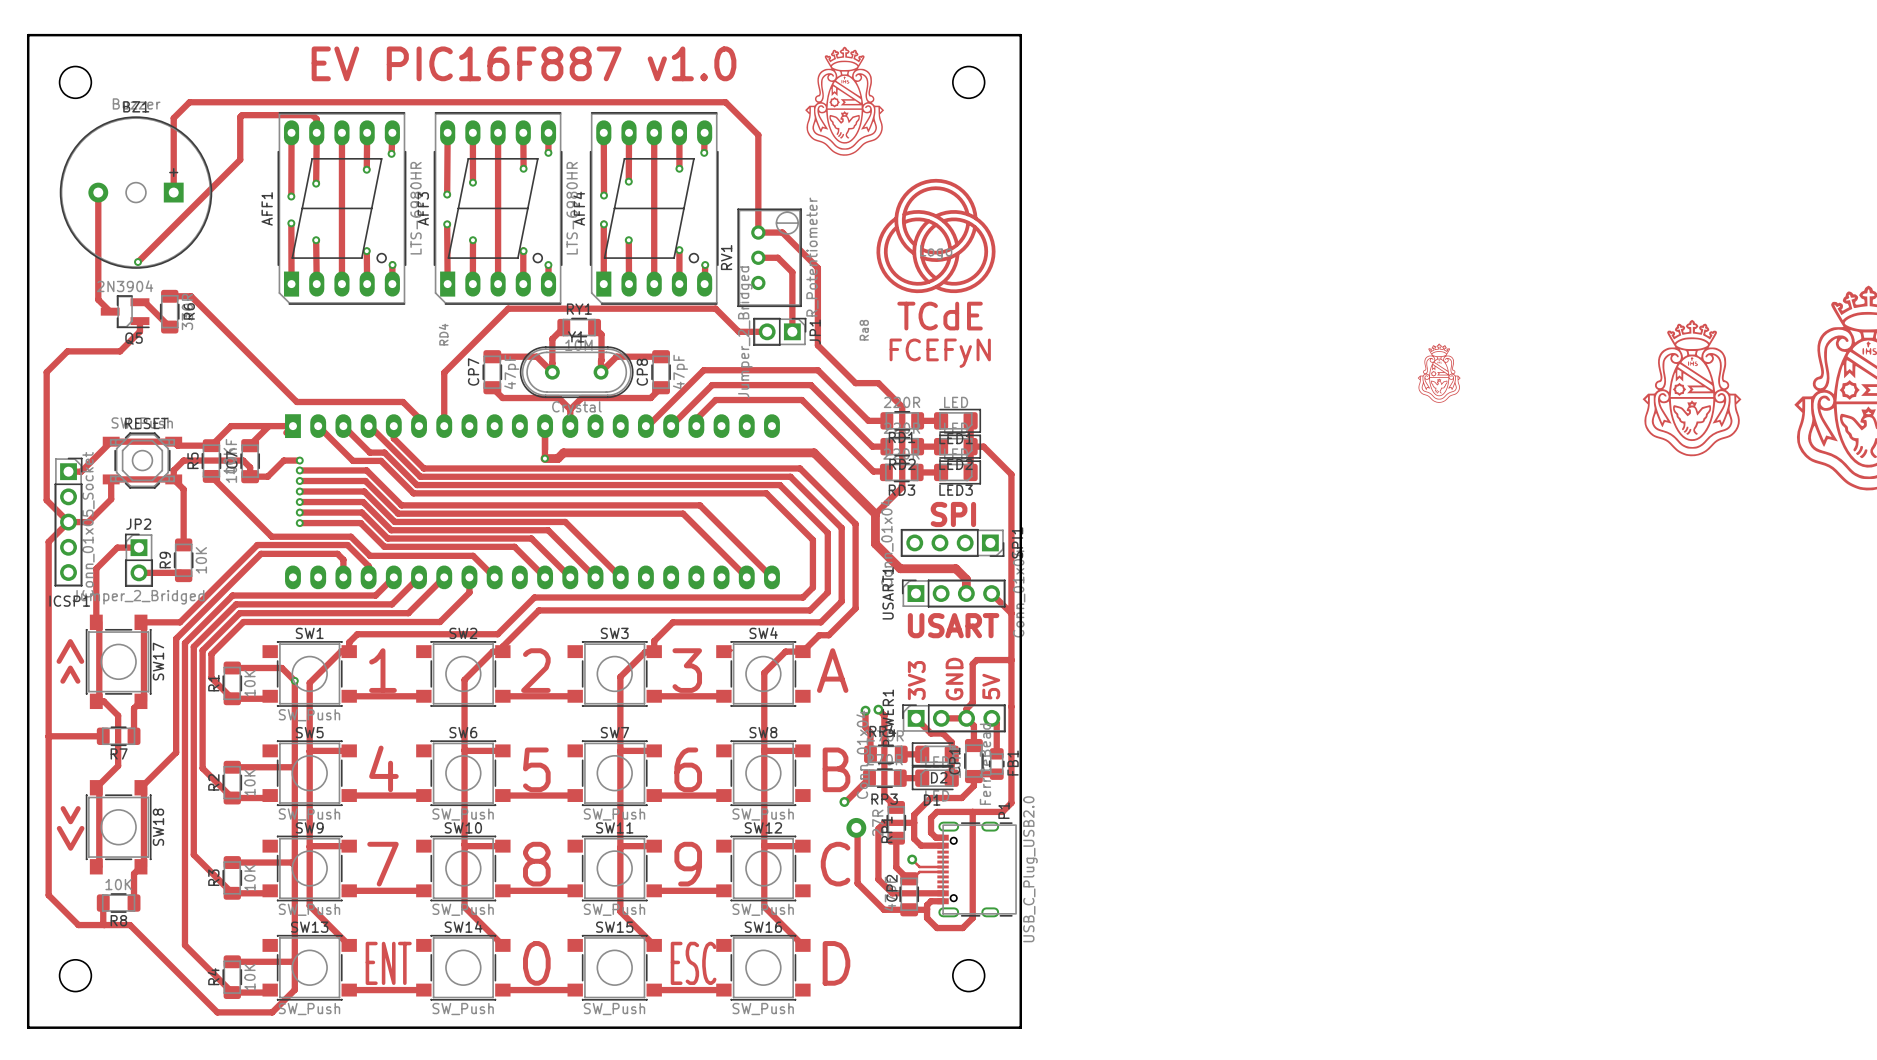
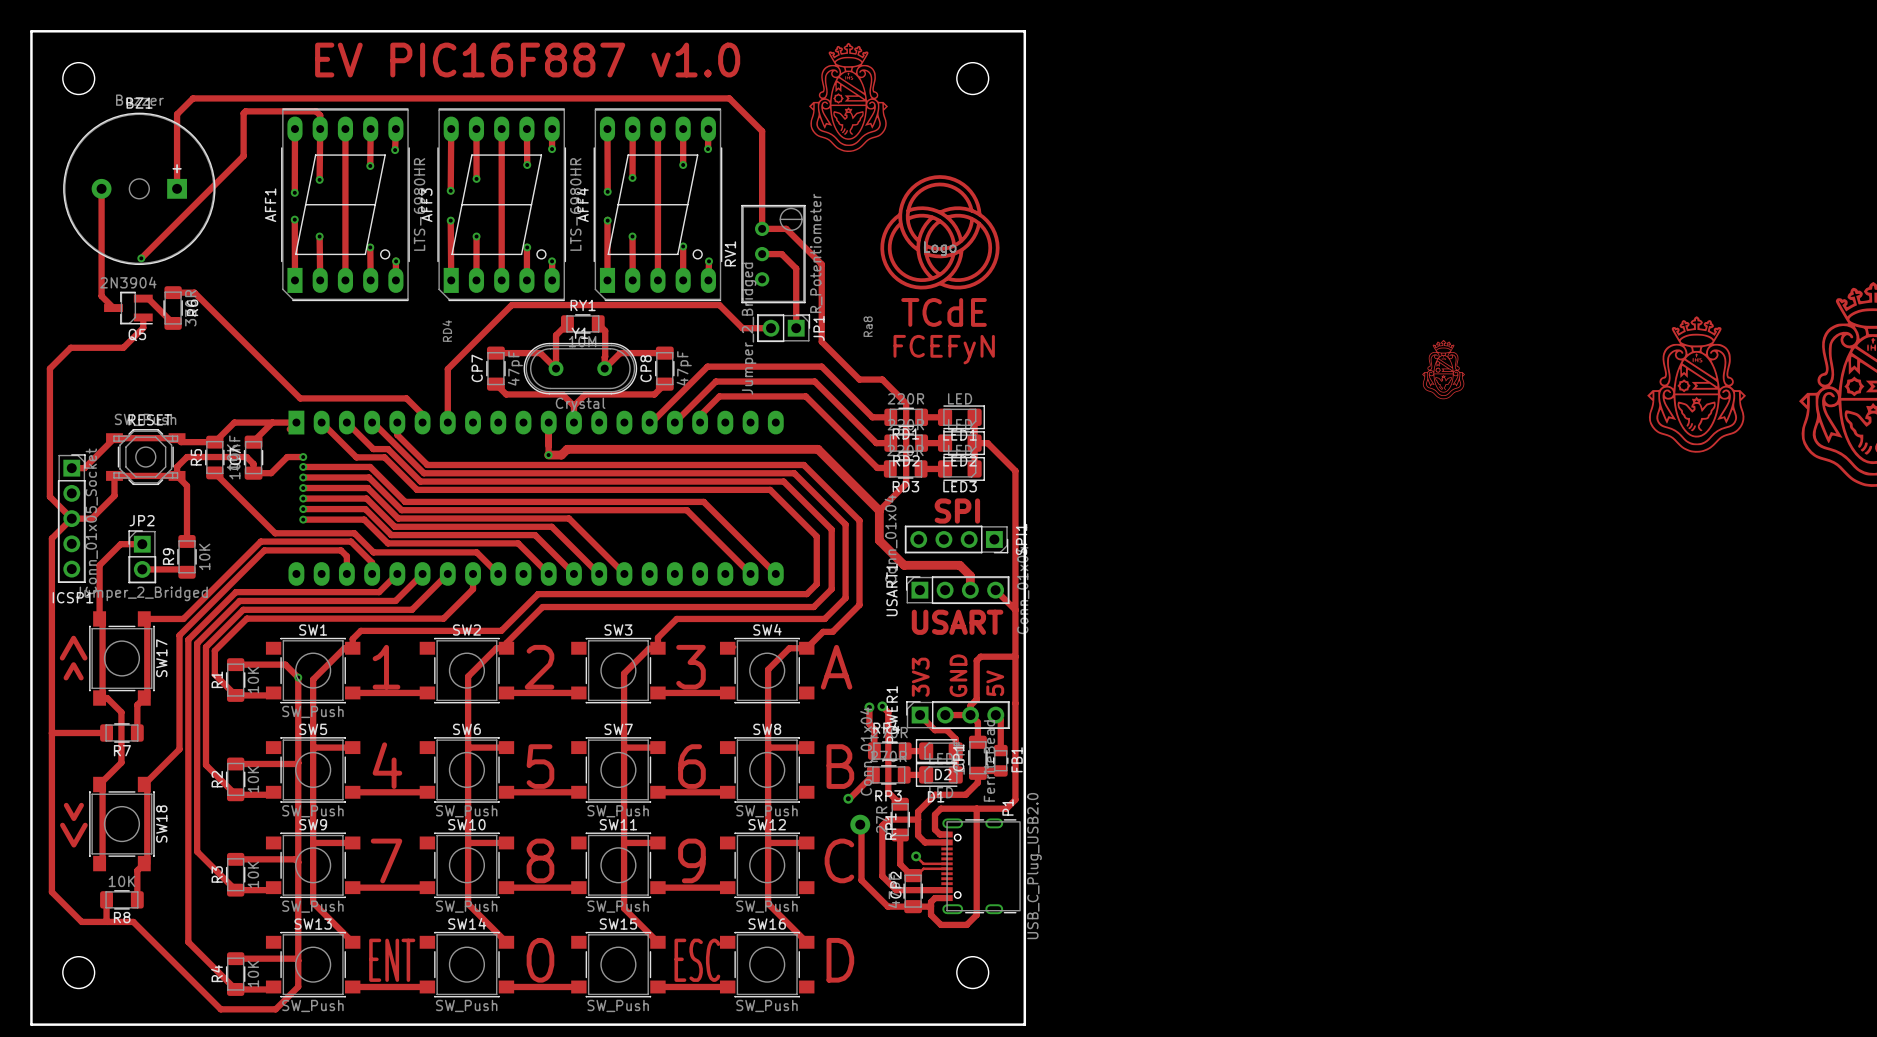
drawing: none -> [924, 241, 957, 257]

